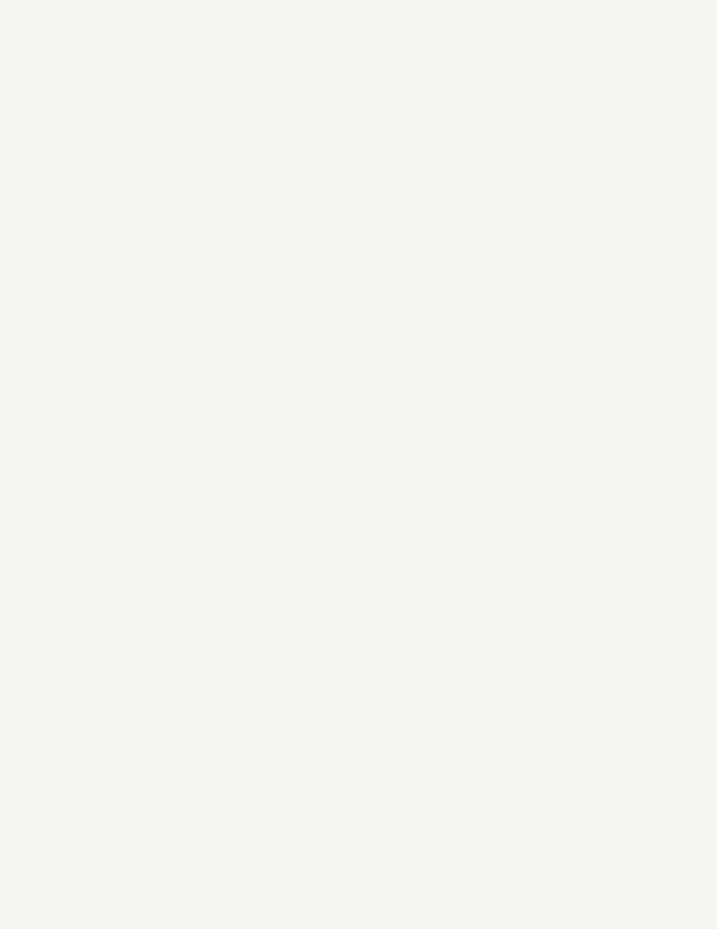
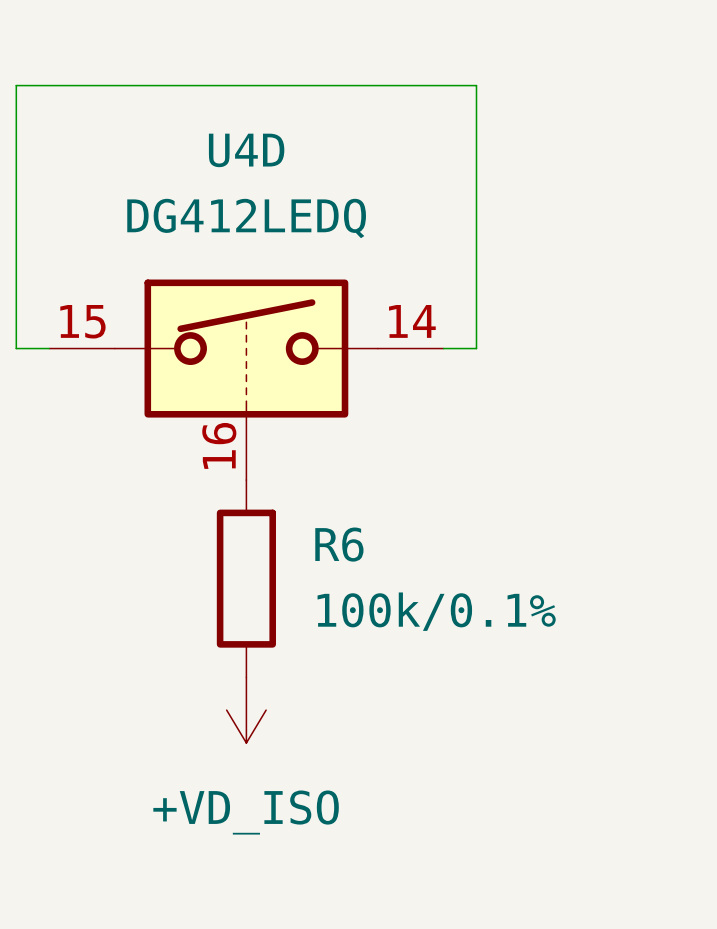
wire: none -> (49, 348) (16, 348) (16, 85) (476, 85) (476, 348) (443, 348)
U4D: none -> DG412LEDQ (246, 379)
R6: none -> 100k/0.1% (246, 578)
power symbol: none -> +VD_ISO (246, 710)

